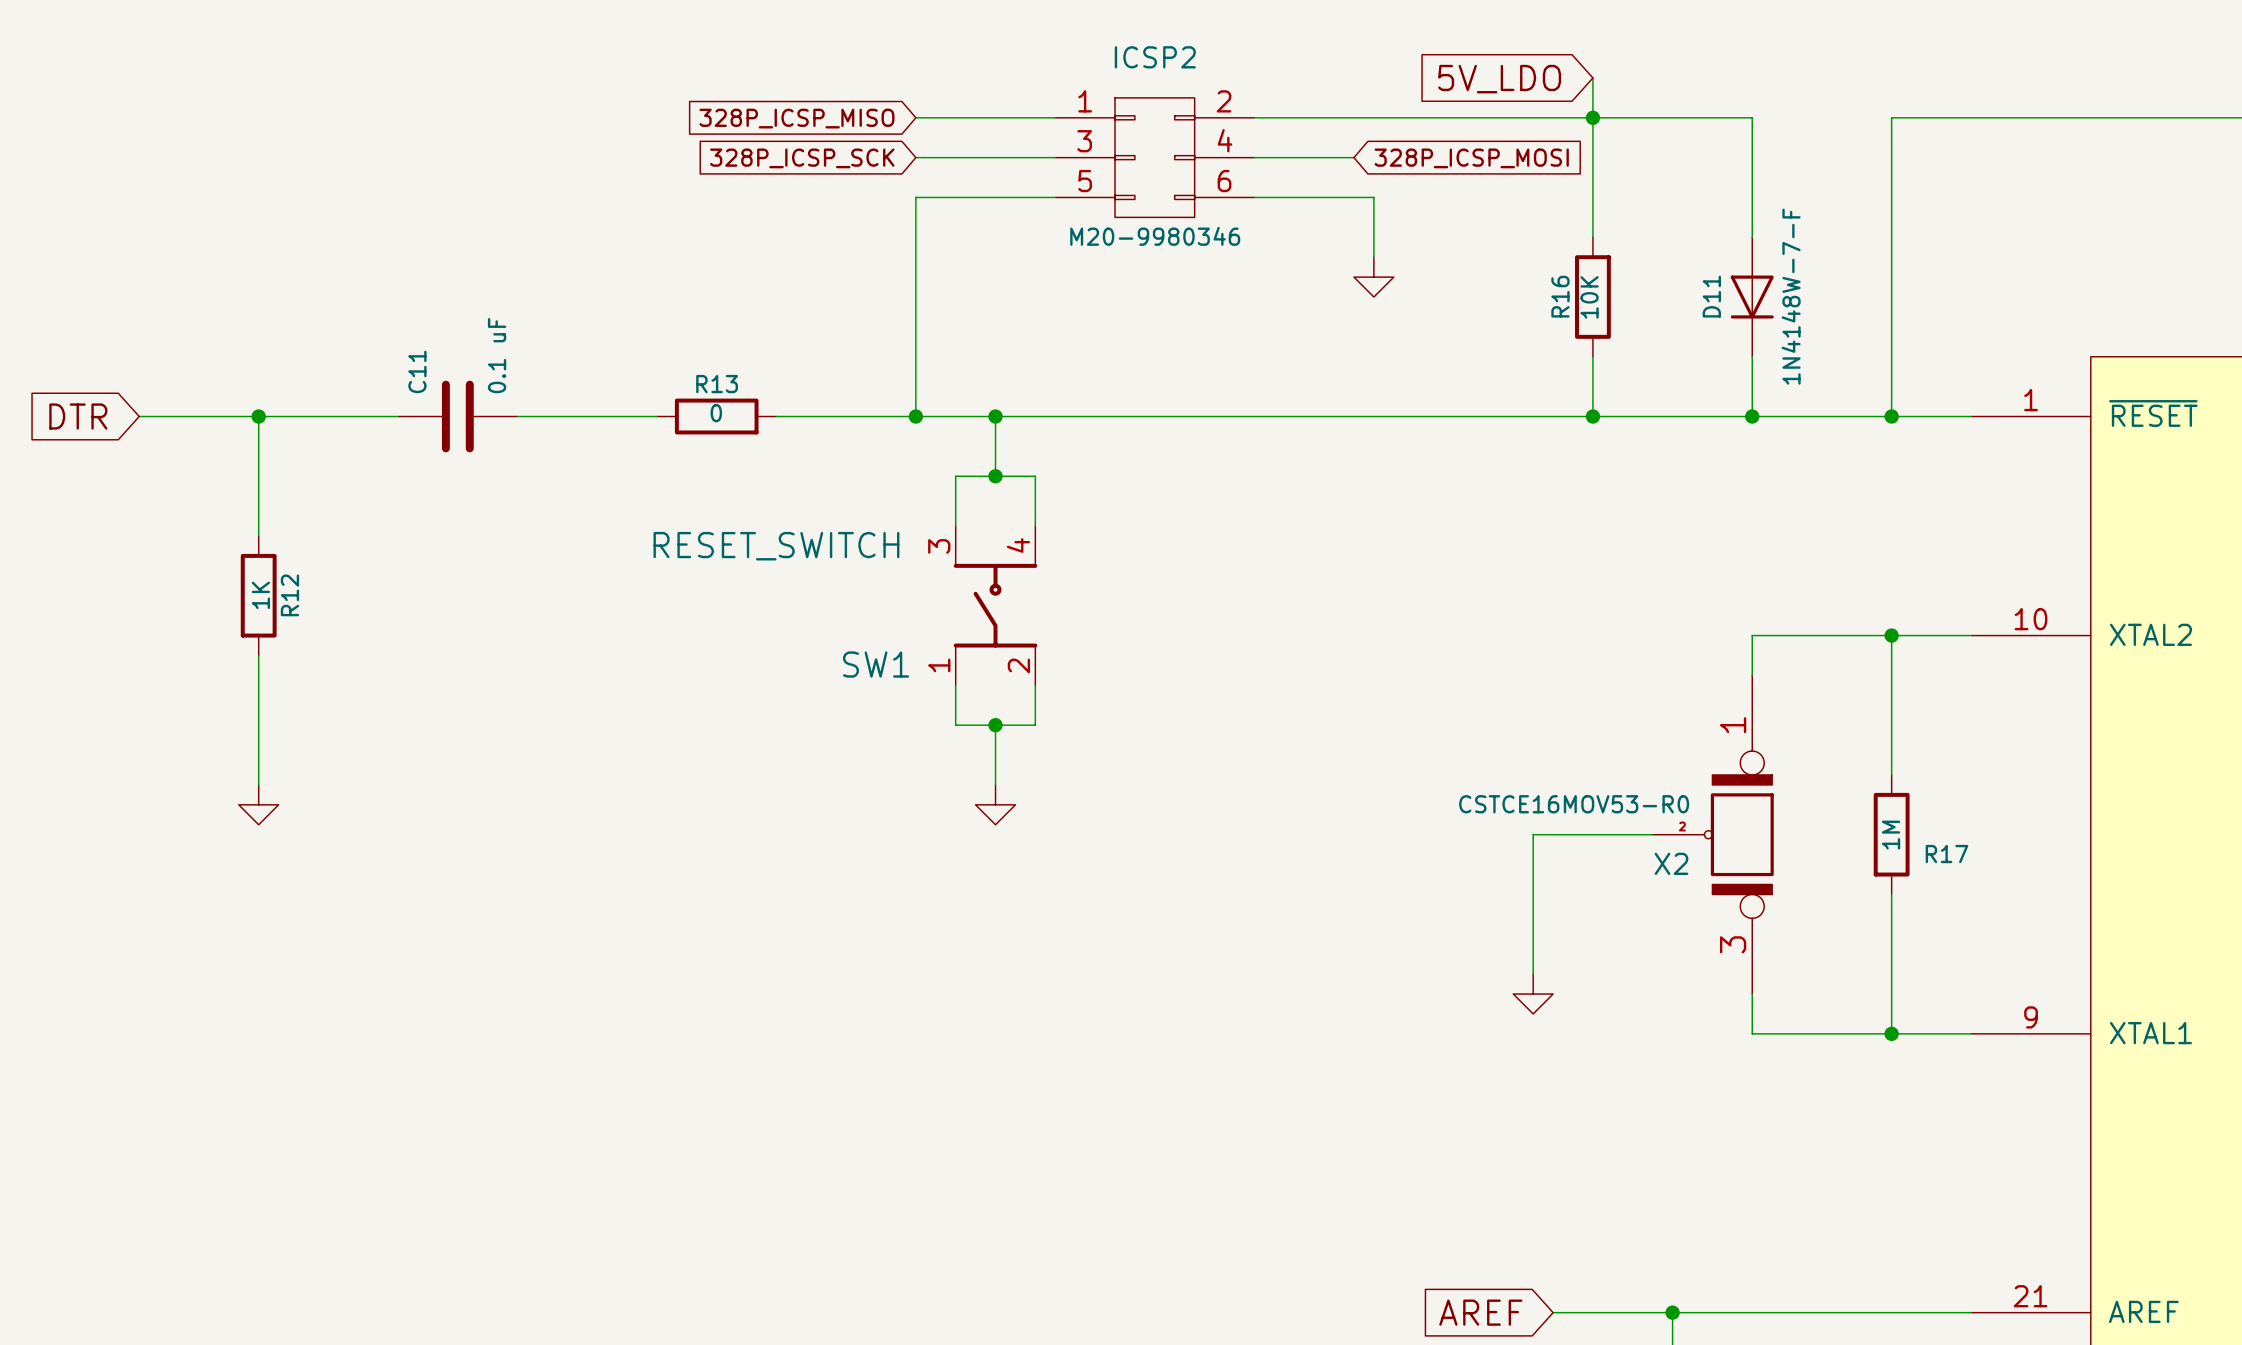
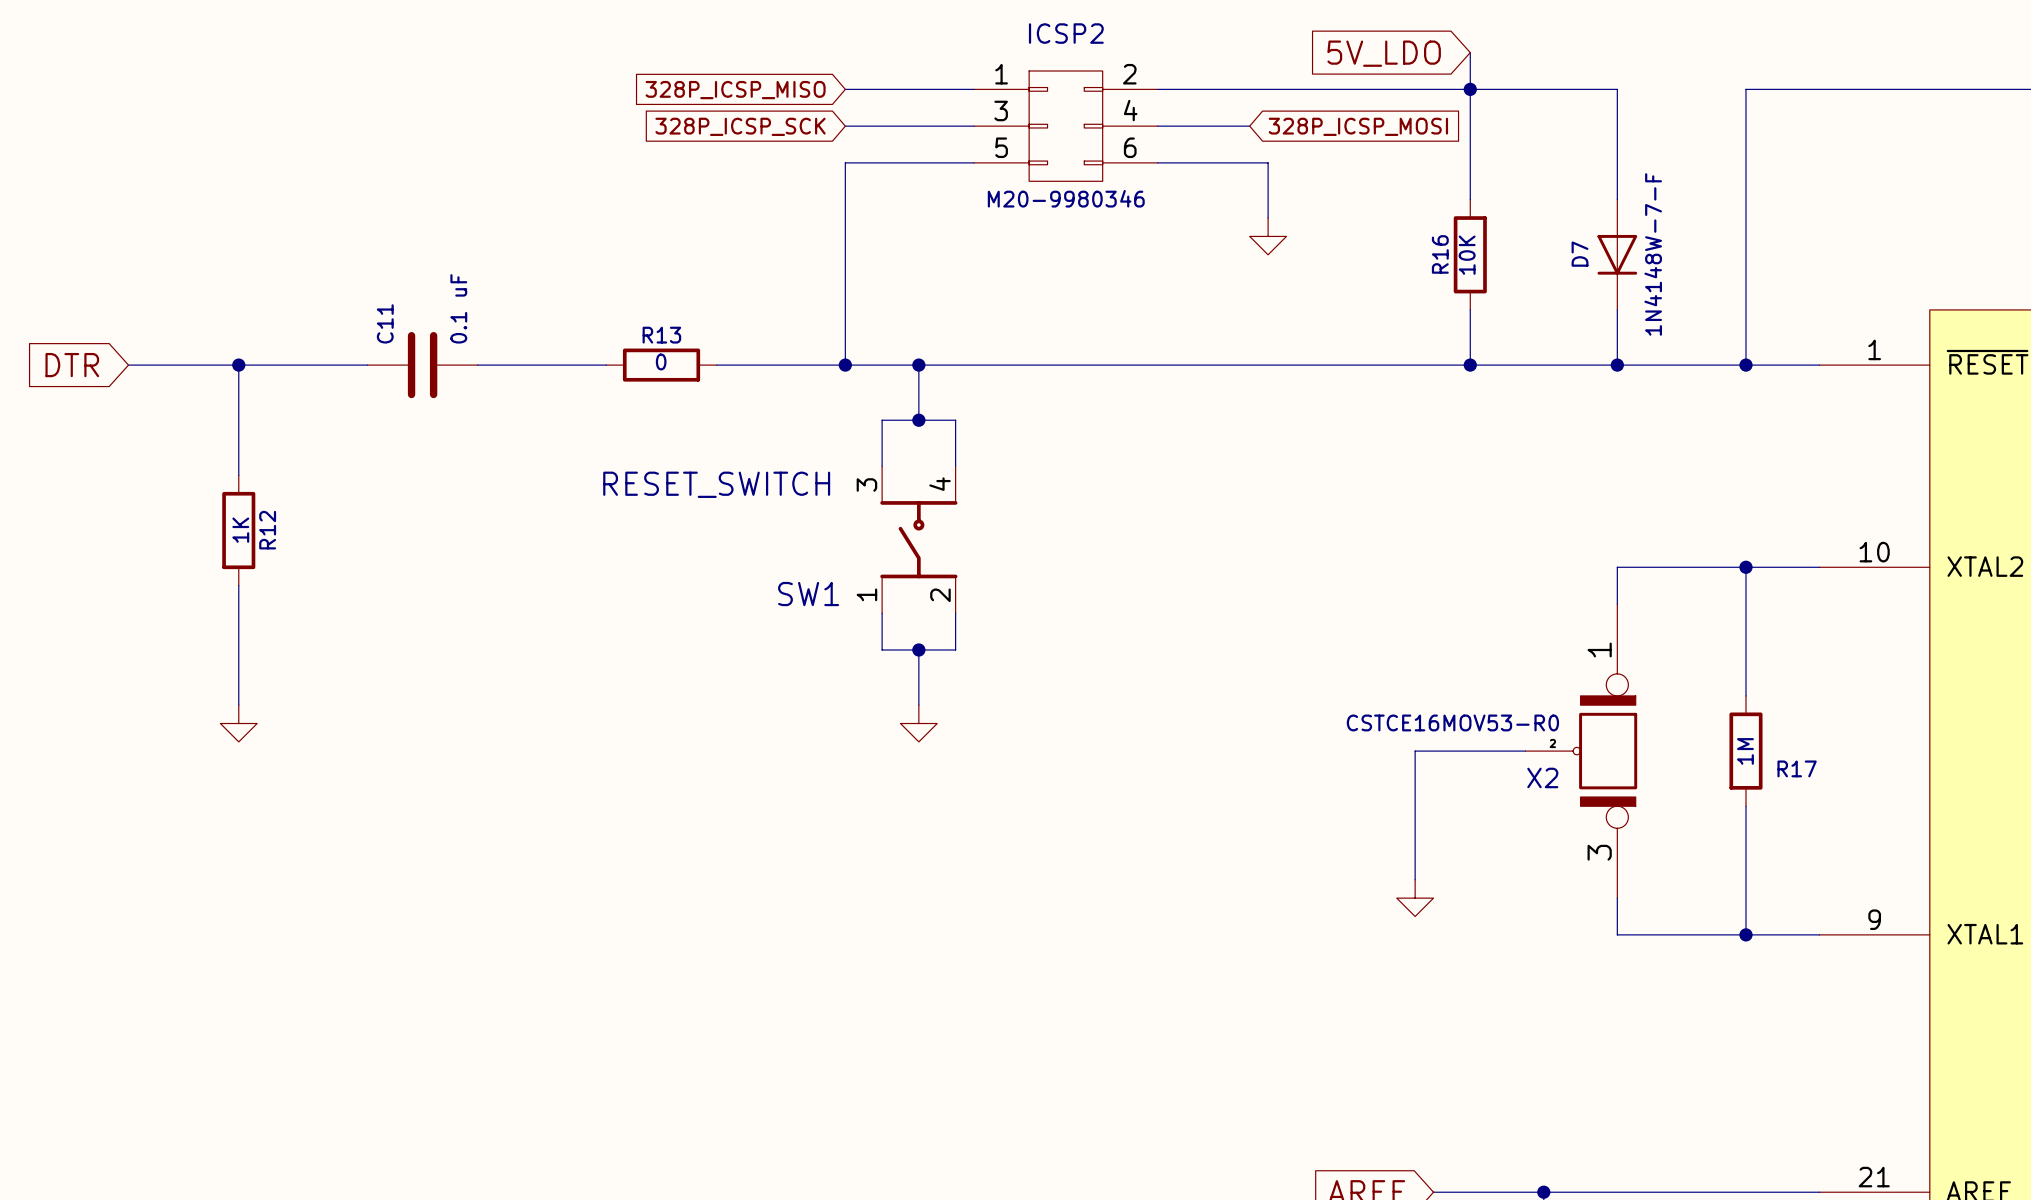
D11 name: D11 (1711, 296) -> D7 (1580, 254)

